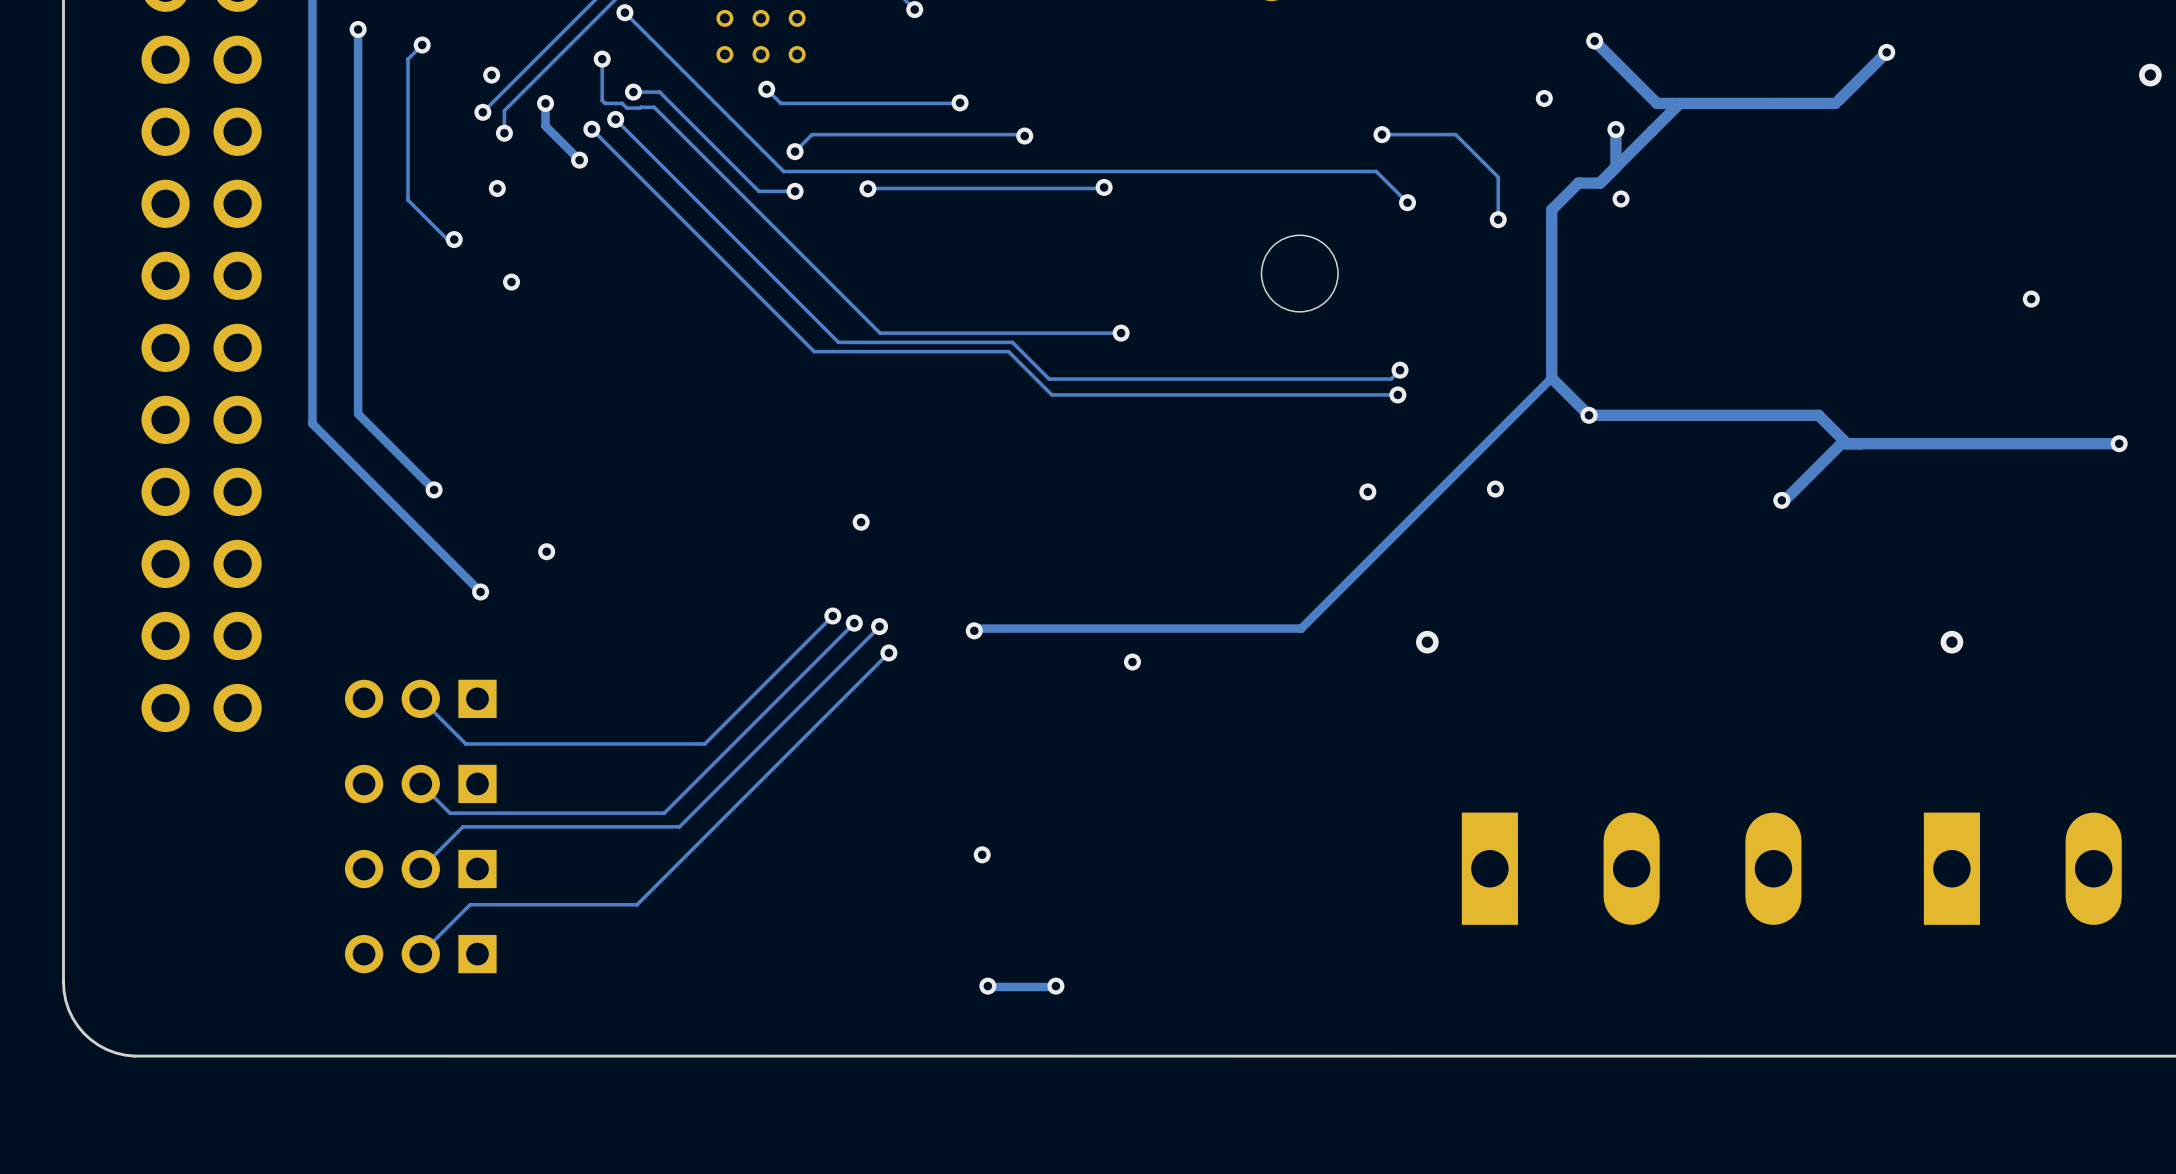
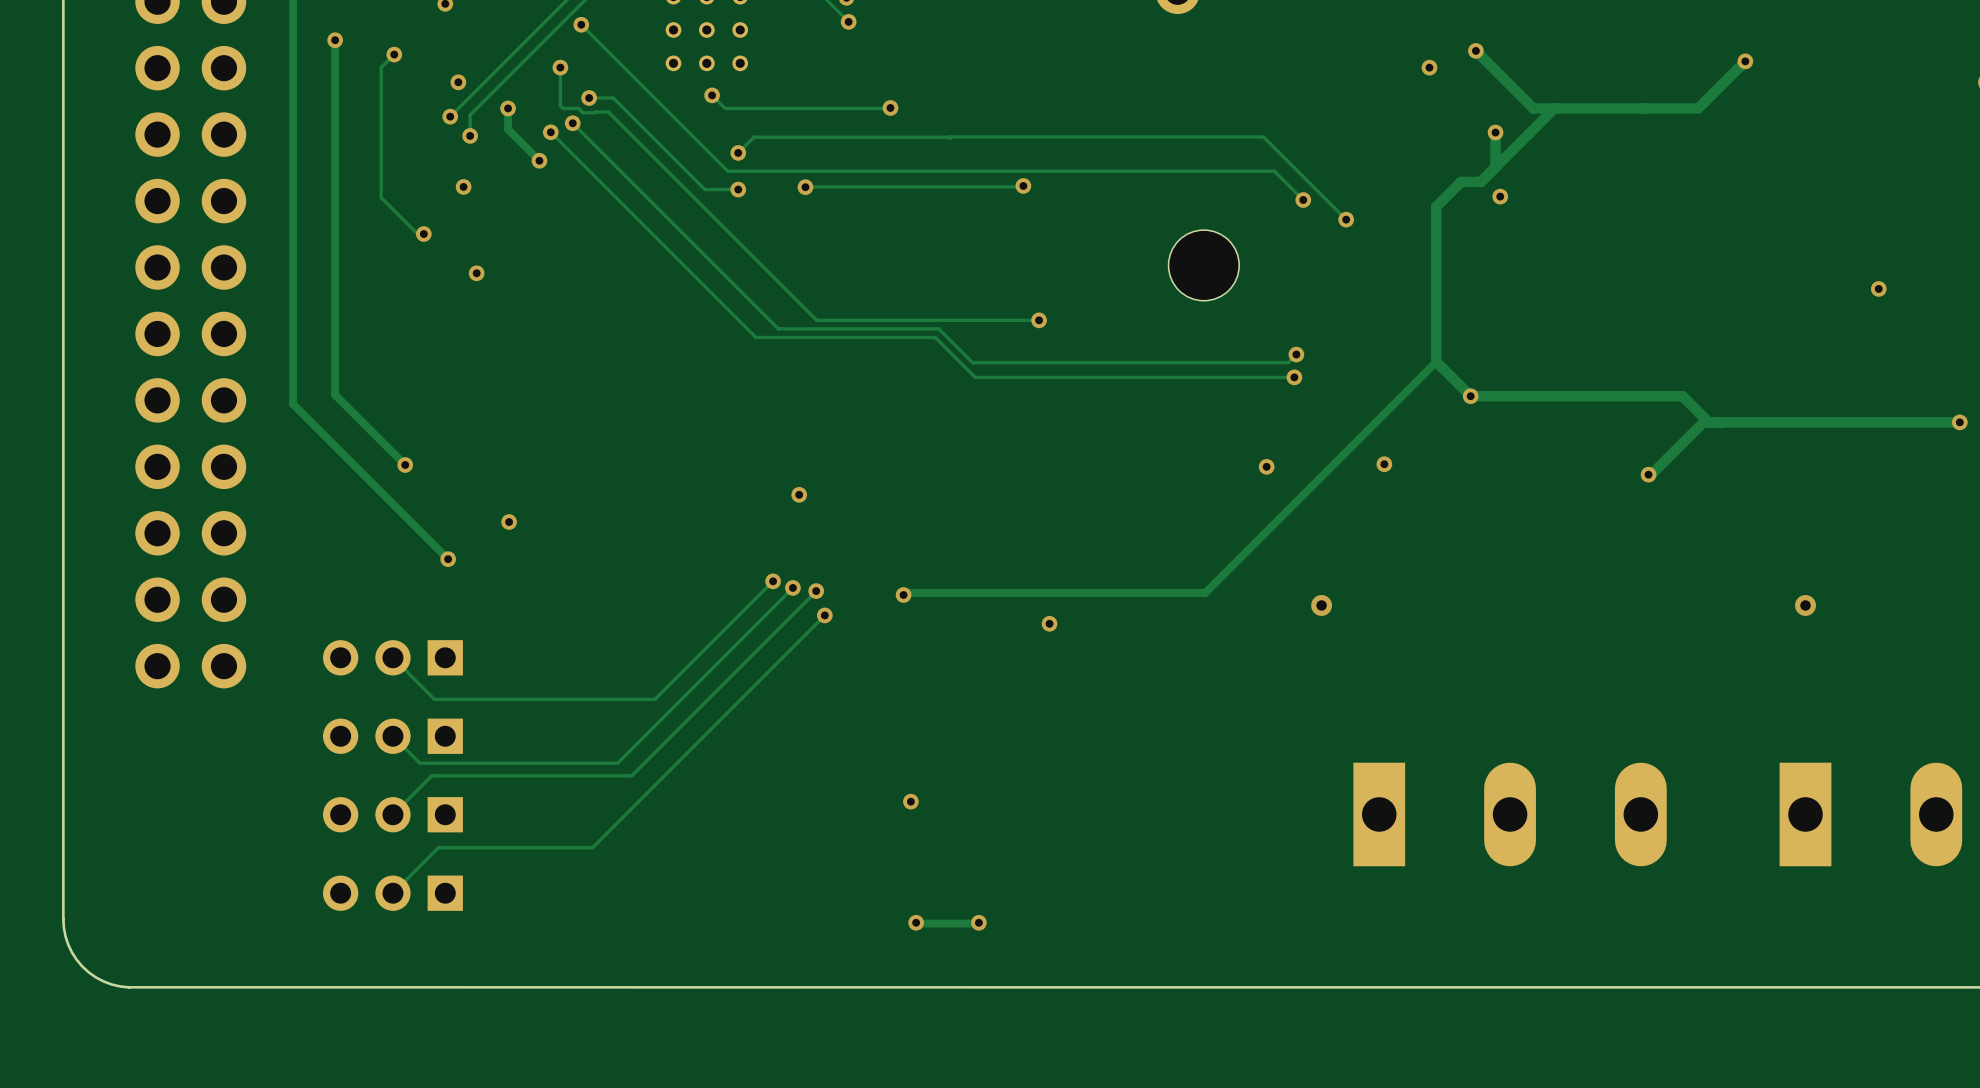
via position: (1544, 98) -> (1429, 67)
track: none -> (949, 136) (1263, 136) (1346, 219)
track: (1382, 134) (1455, 134) (1498, 177) (1498, 219) -> none
via: (1382, 134) -> none
via: (1024, 136) -> none
via position: (1498, 219) -> (1346, 219)

